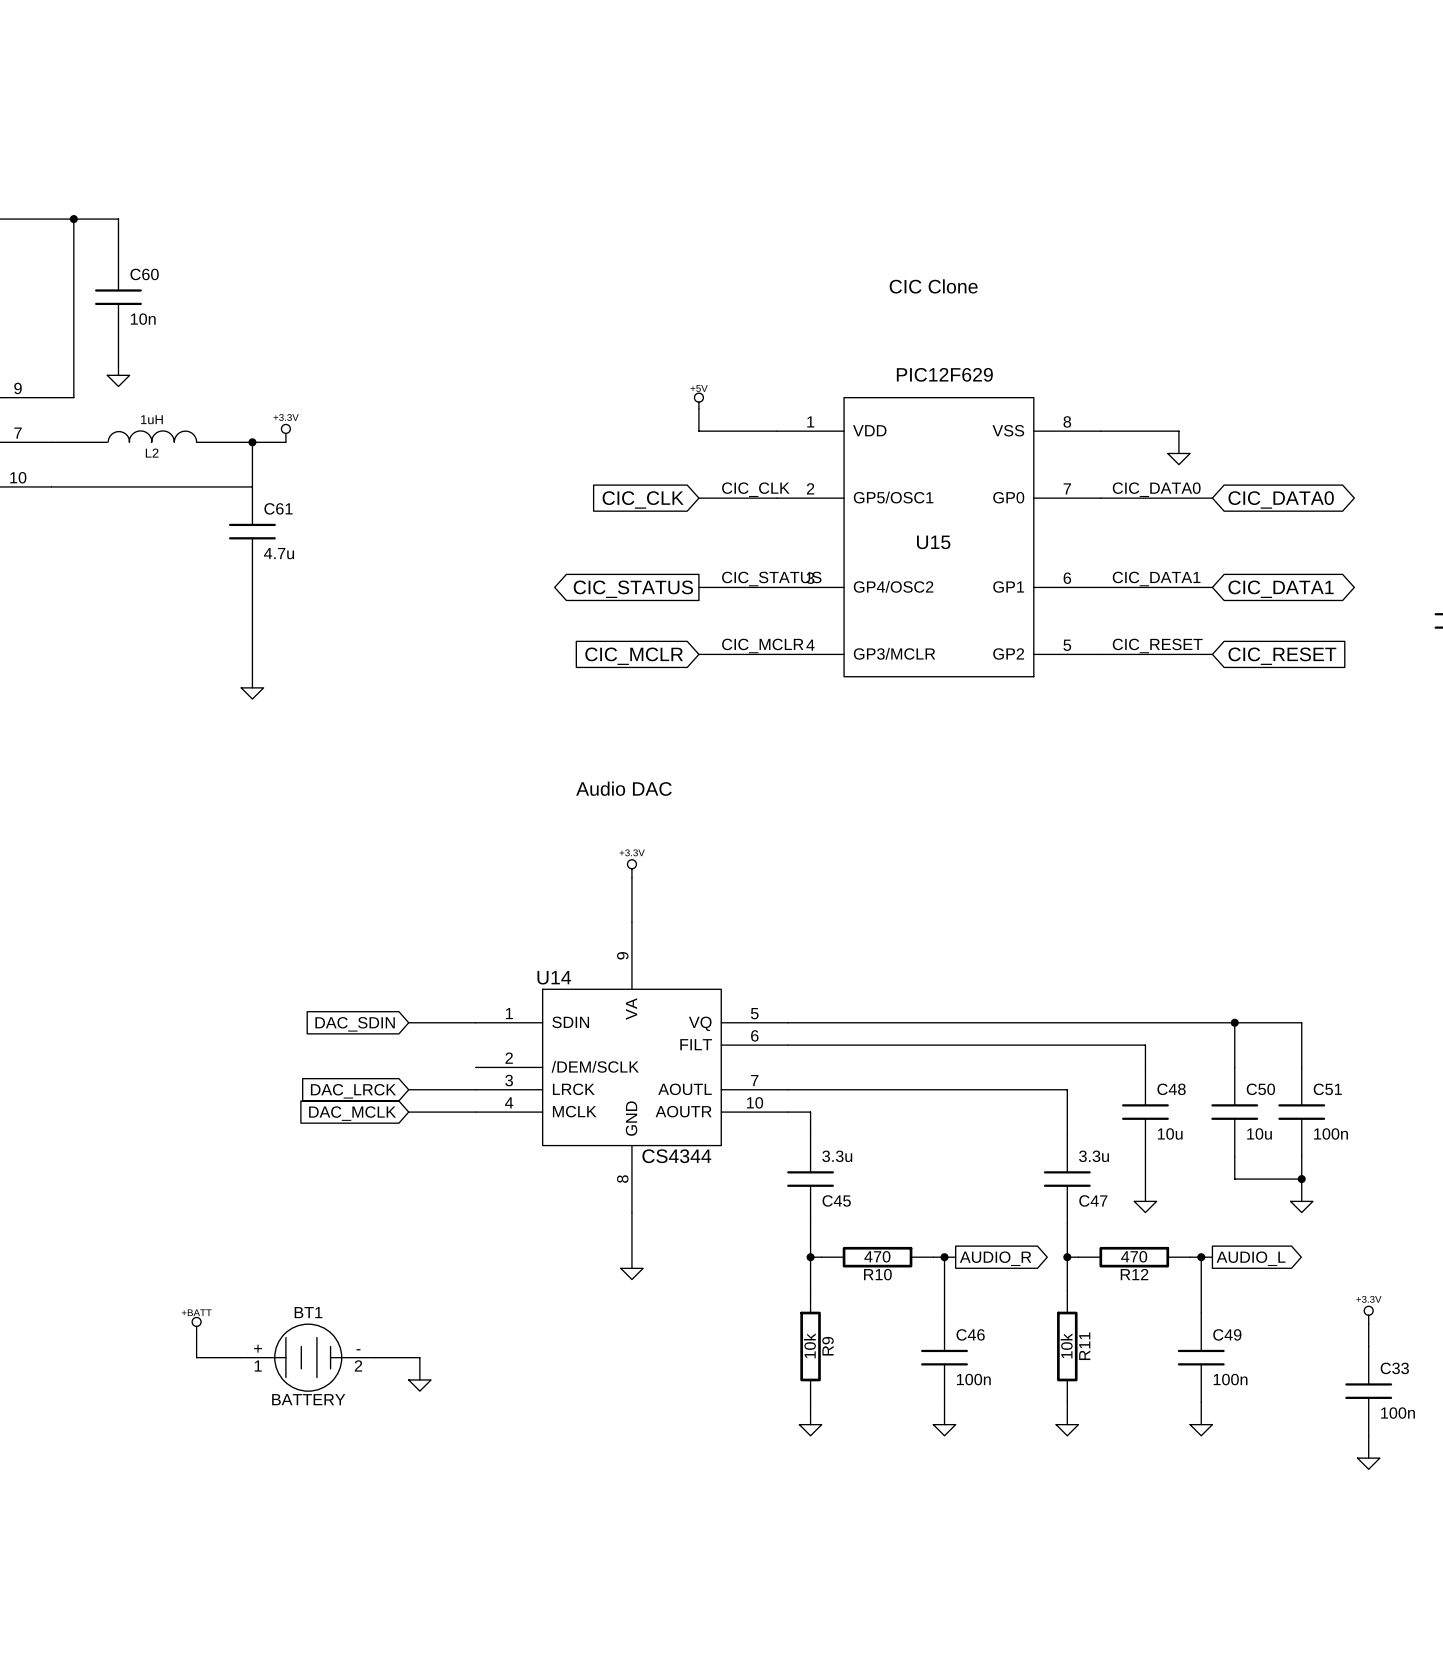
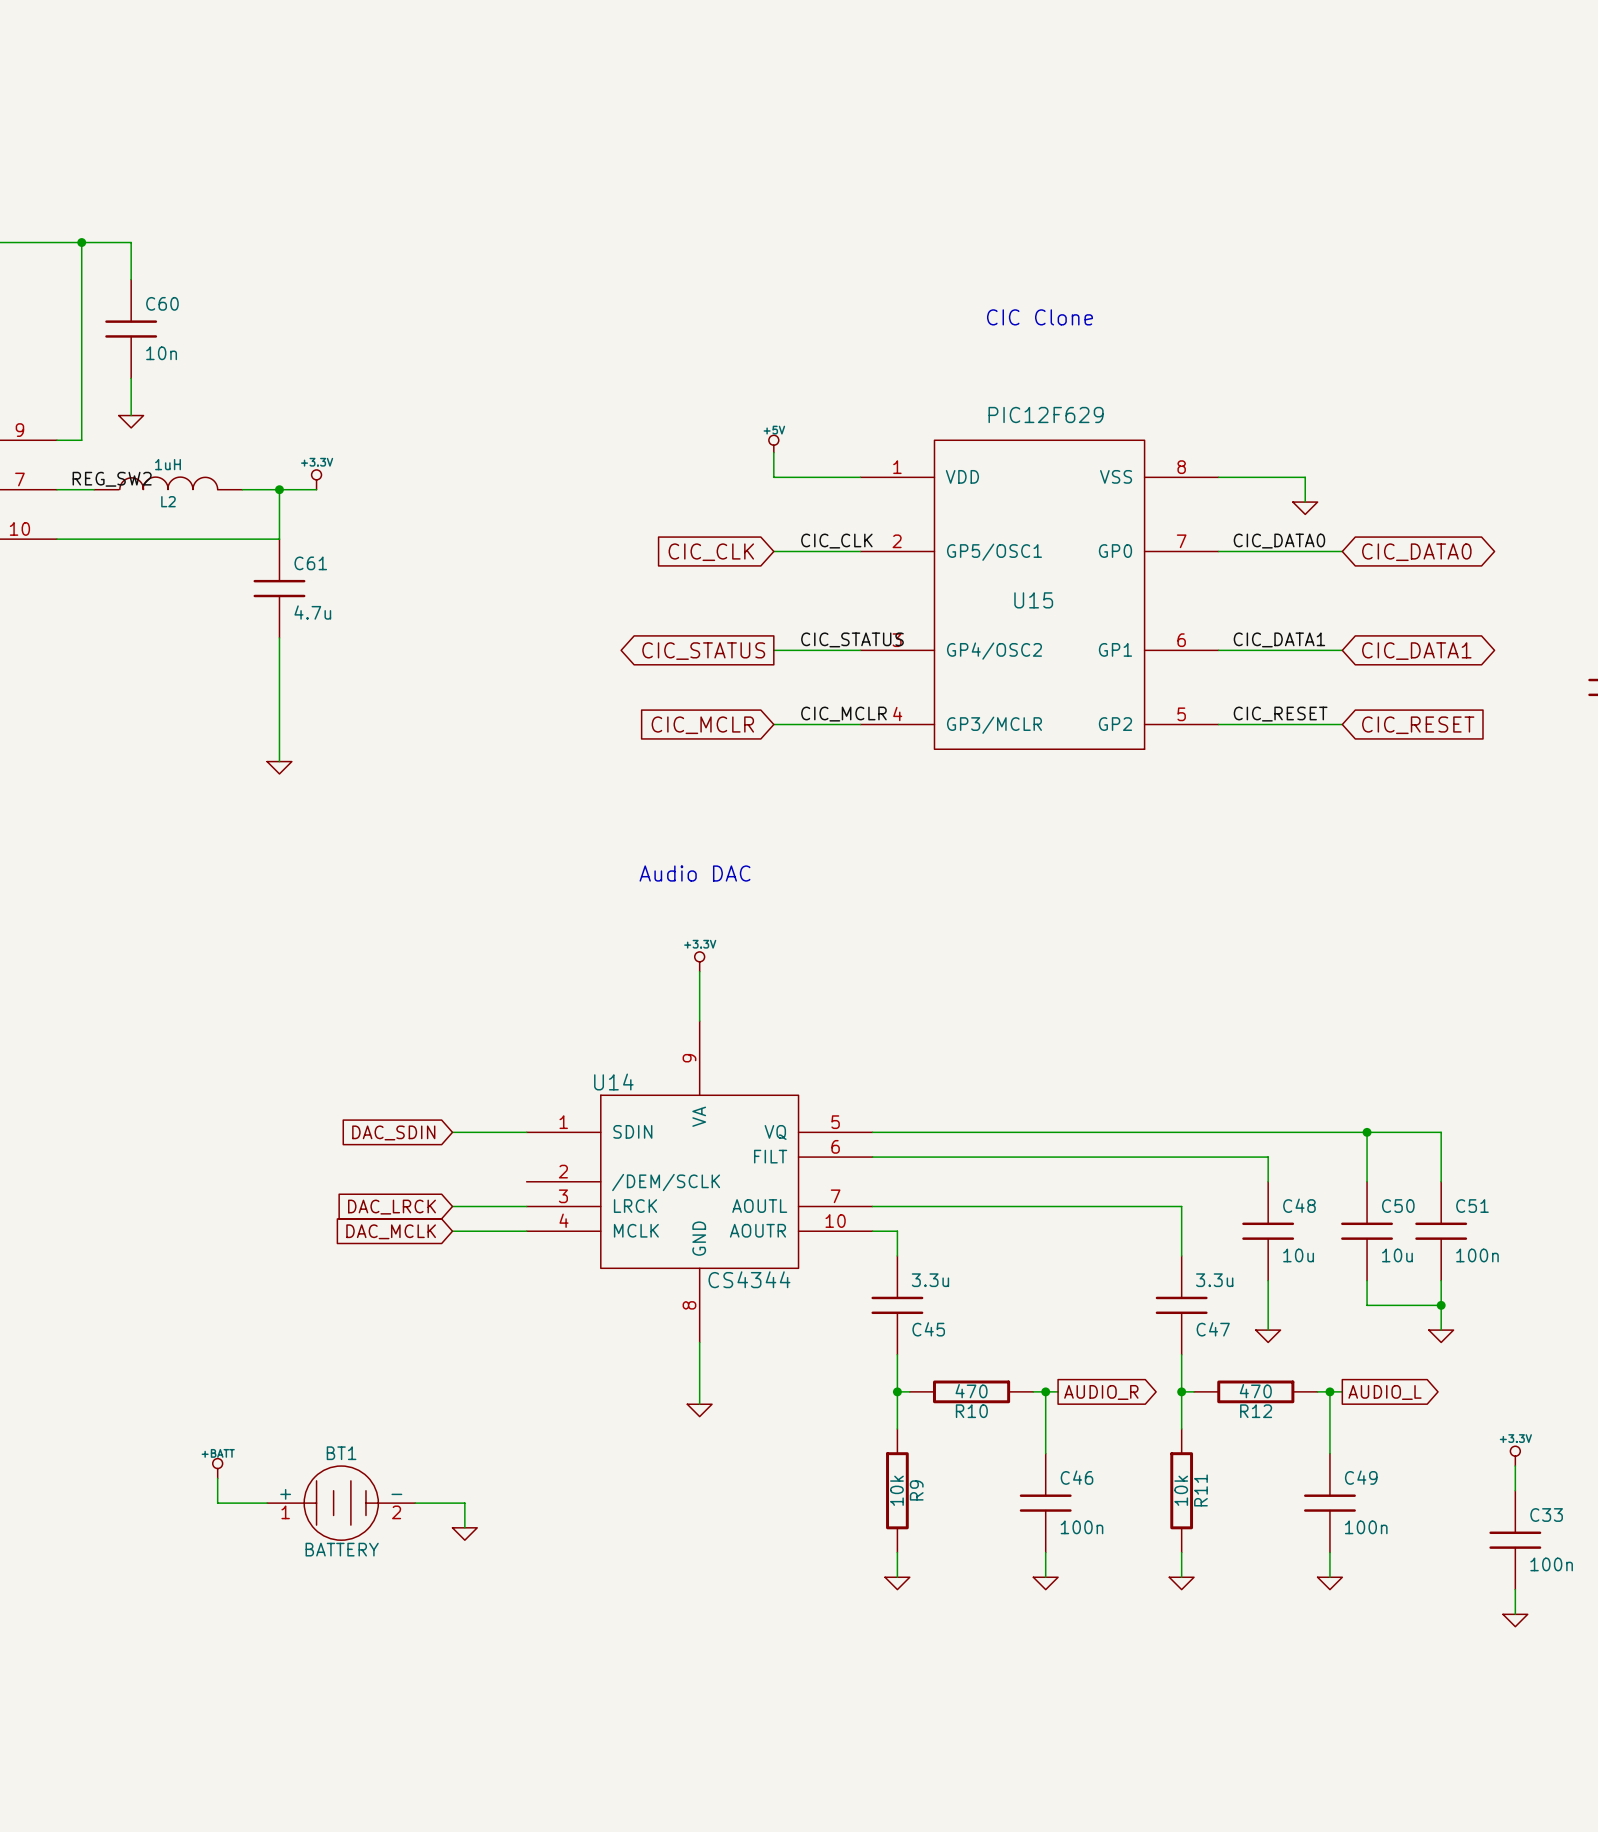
label: none -> REG_SW2 (112, 479)

